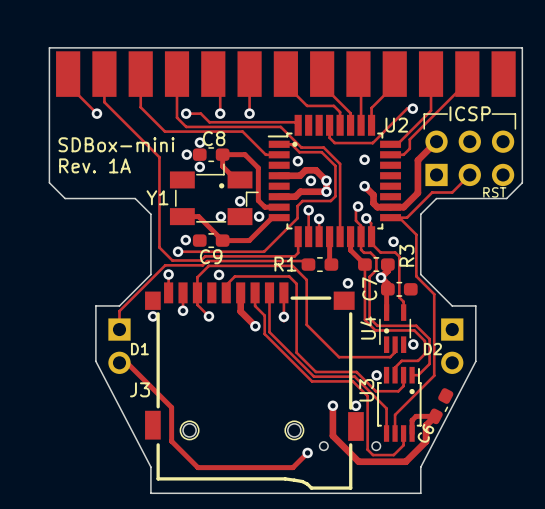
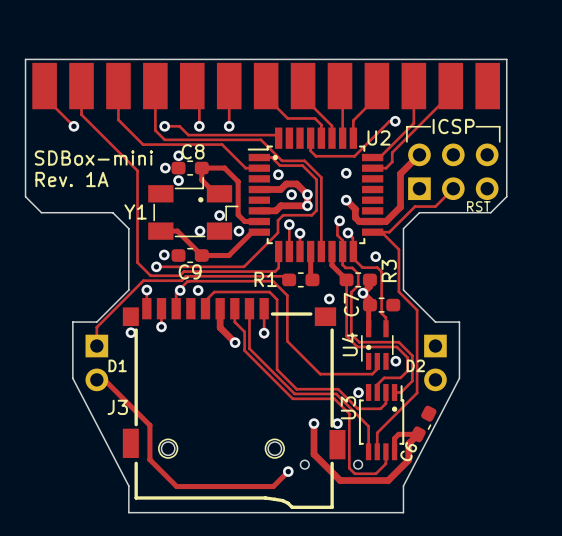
track: (197, 292) (197, 304) (208, 316) -> none
via position: (208, 316) -> (180, 290)

